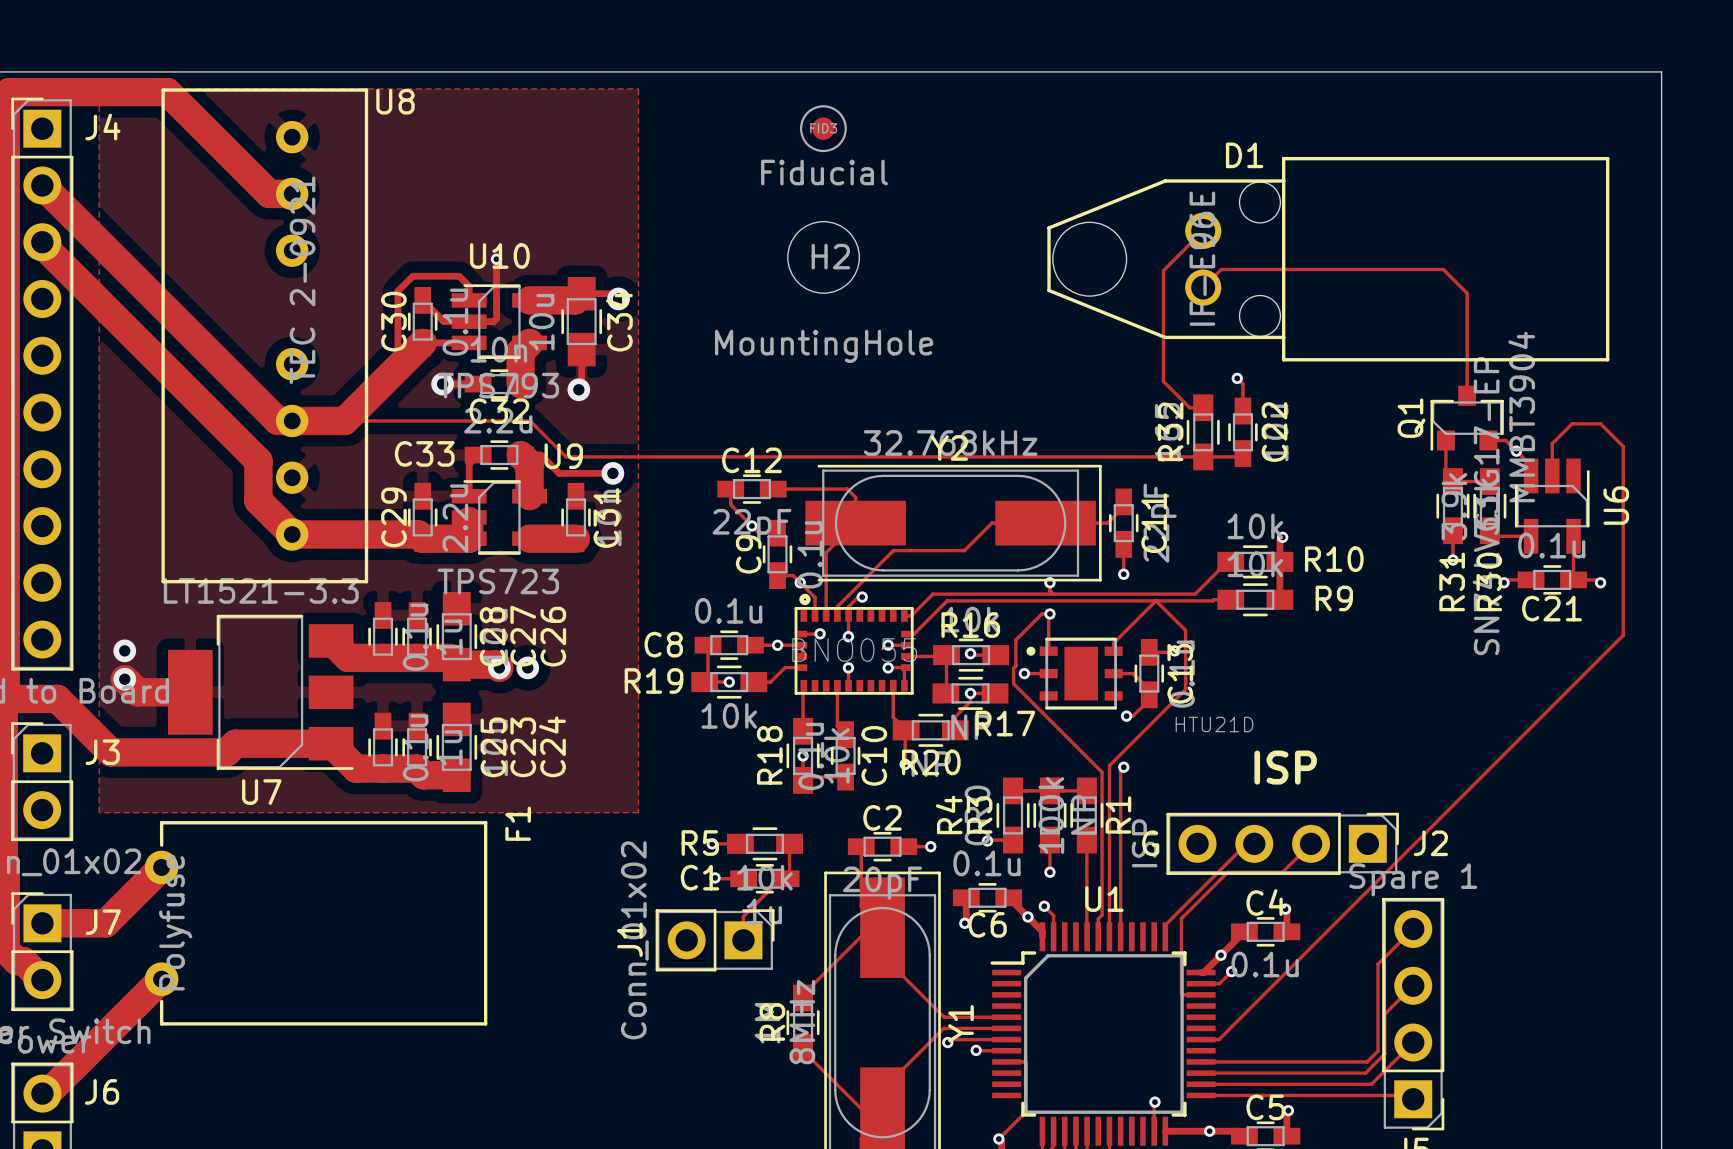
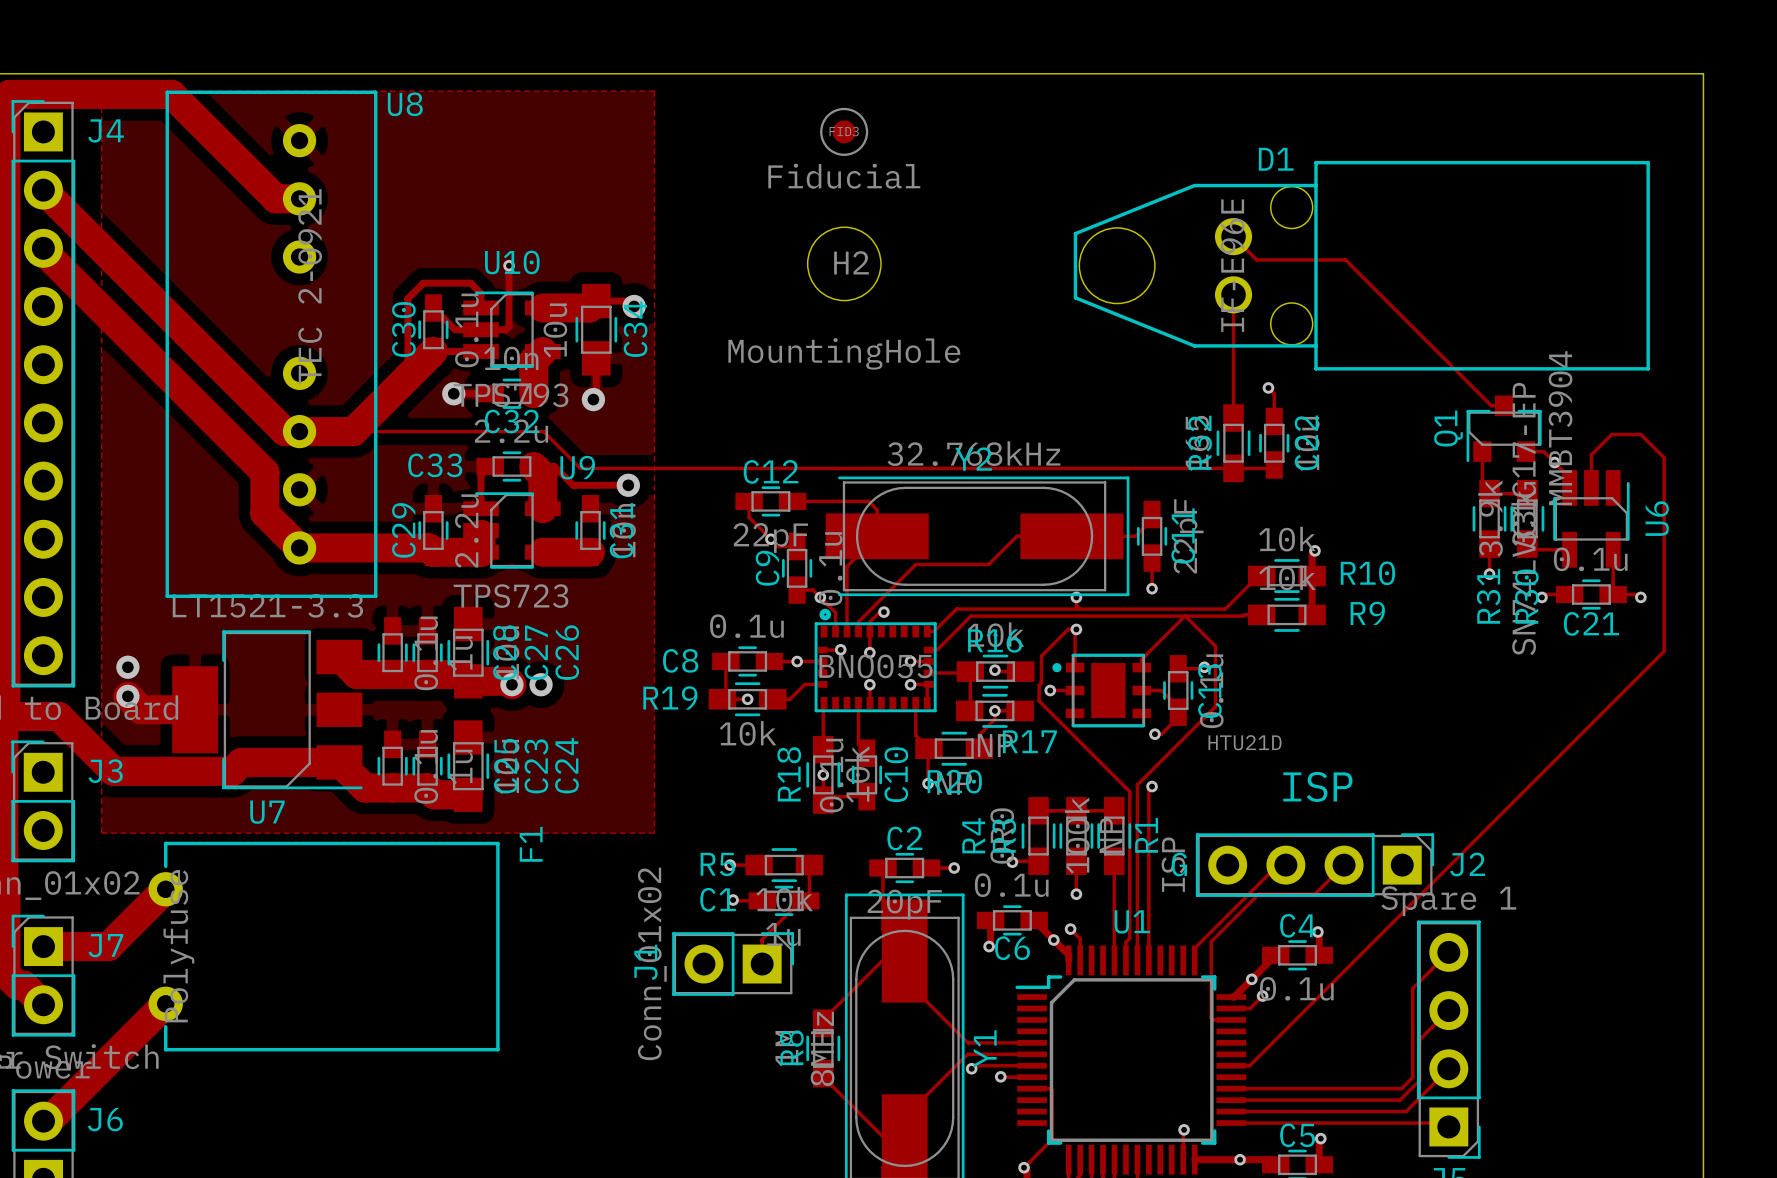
track: (1203, 230) (1163, 270) (1163, 381) (1189, 407) (1203, 407) -> (1233, 294) (1233, 418)
track: (1203, 287) (1221, 269) (1443, 269) (1467, 293) (1467, 395) -> (1233, 236) (1256, 259) (1345, 259) (1491, 405) (1504, 405)

